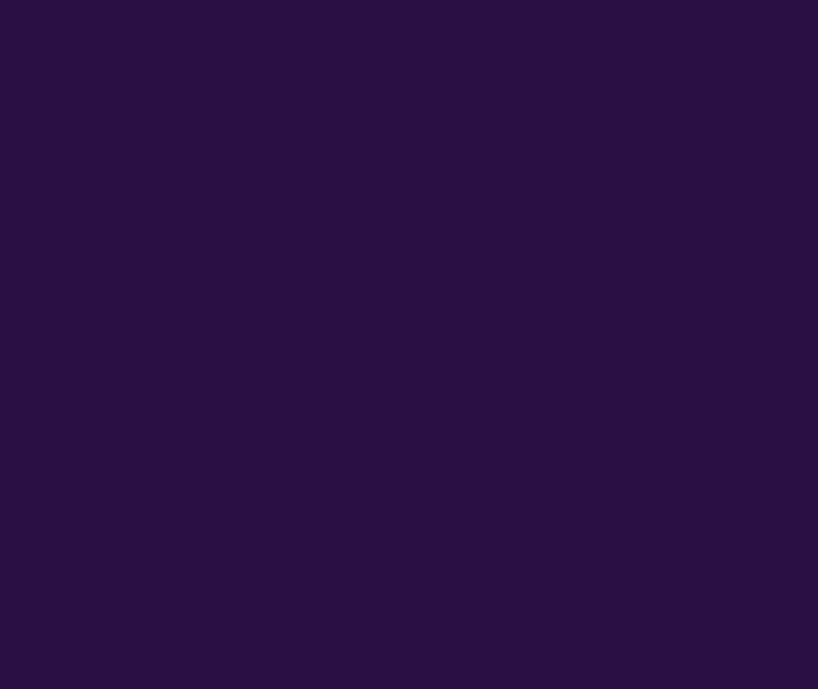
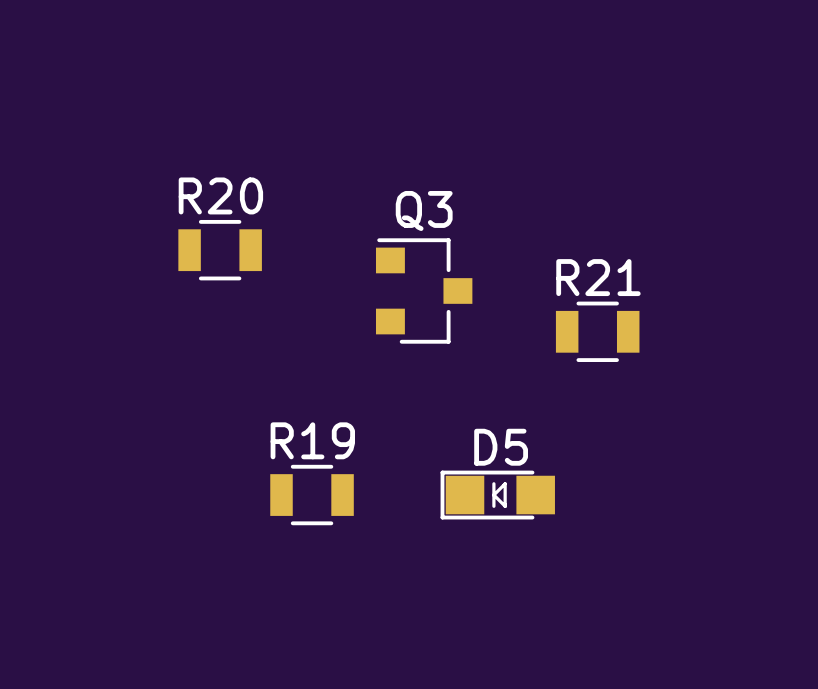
R20: none -> (220, 250)
Q3: none -> (424, 290)
R21: none -> (597, 331)
R19: none -> (312, 495)
D5: none -> (497, 495)

